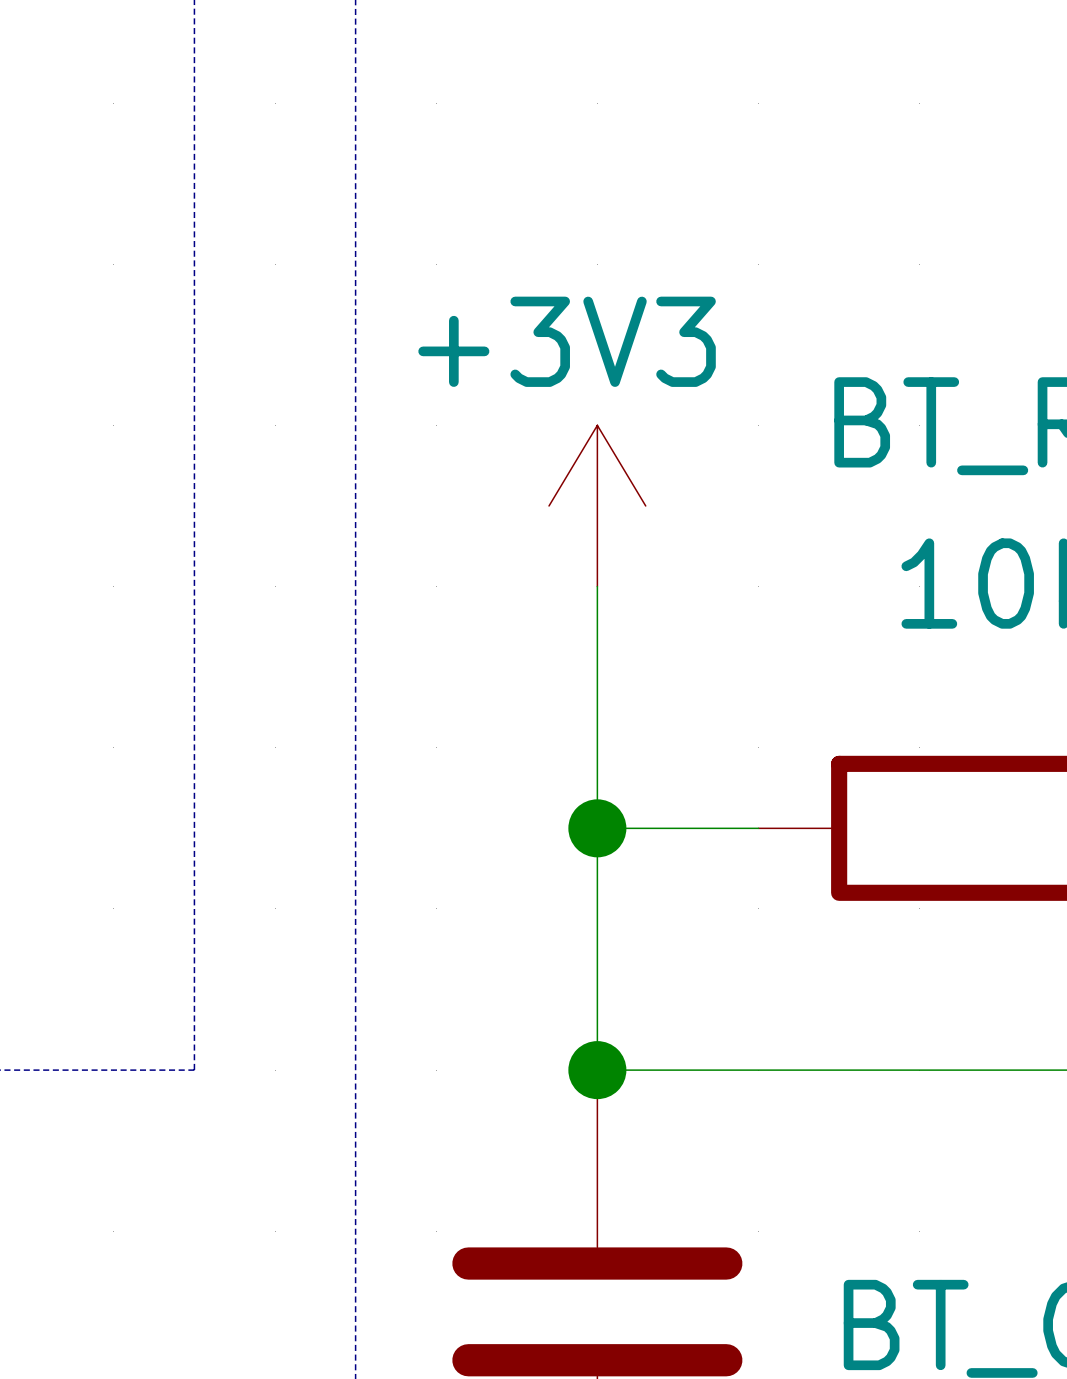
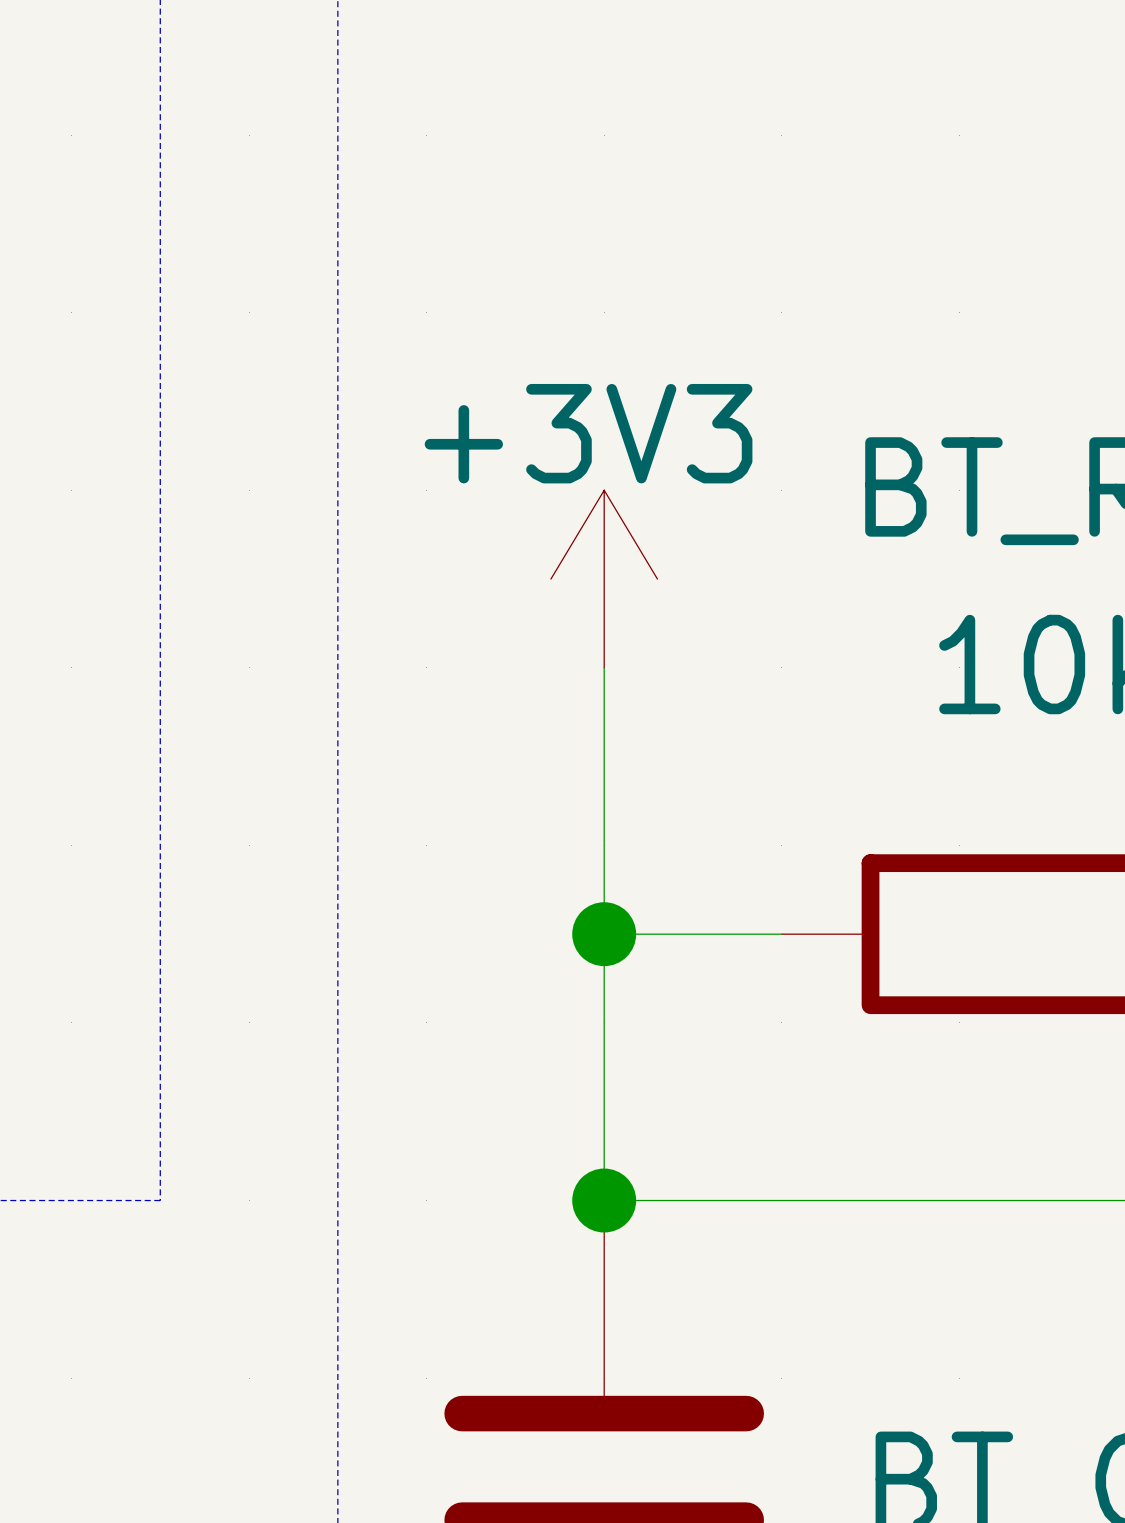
power symbol text position: +3V3 (567, 341) -> +3V3 (588, 433)

